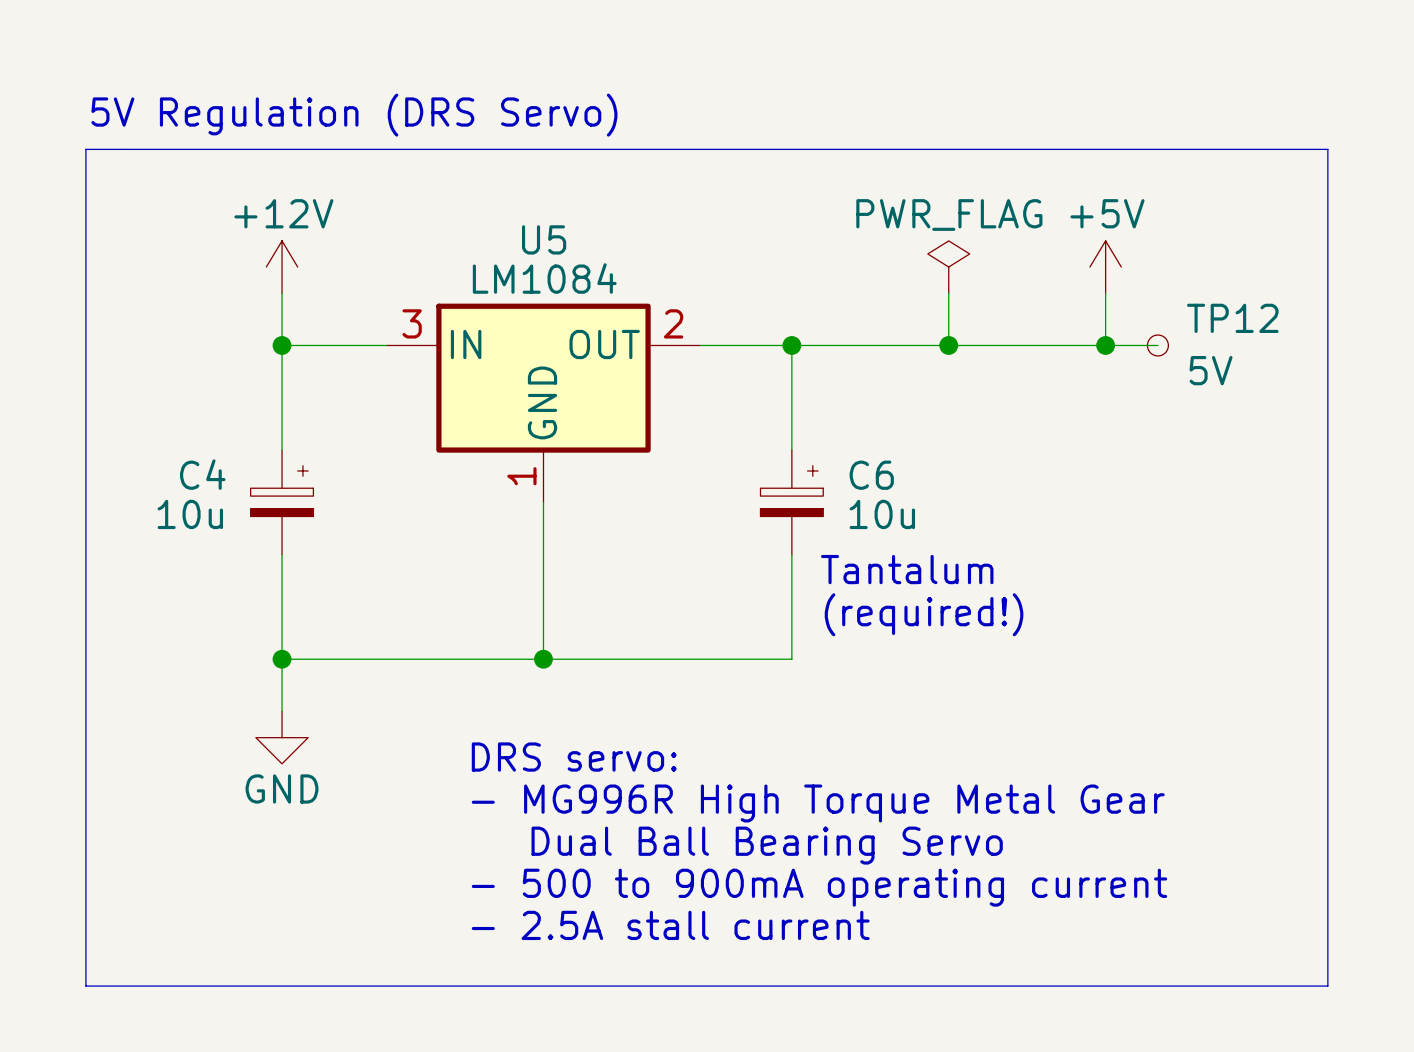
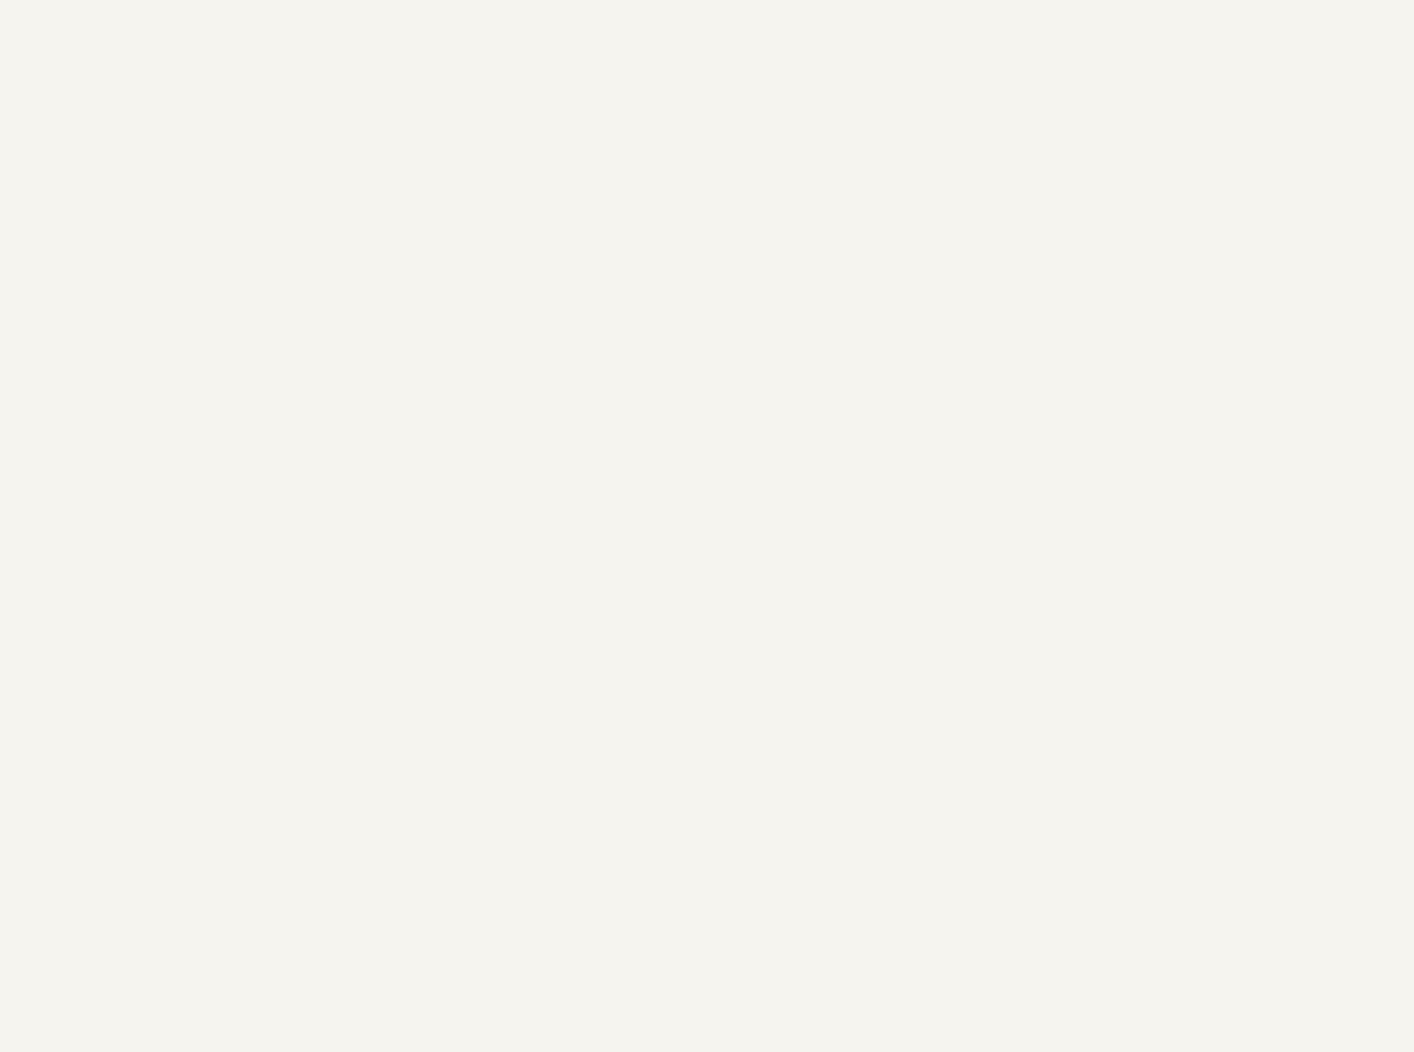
text: 5V Regulation (DRS Servo) (354, 115) -> none
line: (85, 149) (85, 986) (1327, 986) (1327, 149) (85, 149) -> none
power symbol: +12V (282, 267) -> none
power symbol: PWR_FLAG (948, 267) -> none
power symbol: +5V (1105, 267) -> none
wire: (282, 293) (282, 450) -> none
wire: (948, 293) (948, 345) -> none
wire: (1105, 293) (1105, 345) -> none
wire: (282, 345) (386, 345) -> none
junction: (282, 345) -> none
wire: (700, 345) (1157, 345) -> none
wire: (791, 345) (791, 450) -> none
junction: (791, 345) -> none
junction: (948, 345) -> none
junction: (1105, 345) -> none
TP12: 5V (1157, 345) -> none
U5: LM1084 (543, 403) -> none
C4: 10u (282, 502) -> none
wire: (543, 502) (543, 659) -> none
C6: 10u (791, 502) -> none
wire: (282, 554) (282, 711) -> none
wire: (791, 554) (791, 659) (282, 659) -> none
text: Tantalum (907, 569) -> none
text: (required!) (924, 614) -> none
junction: (282, 659) -> none
junction: (543, 659) -> none
power symbol: GND (282, 737) -> none
text: DRS servo: (574, 757) -> none
text: - MG996R High Torque Metal Gear (818, 803) -> none
text: Dual Ball Bearing Servo (767, 845) -> none
text: - 500 to 900mA operating current (819, 887) -> none
text: - 2.5A stall current (670, 925) -> none

